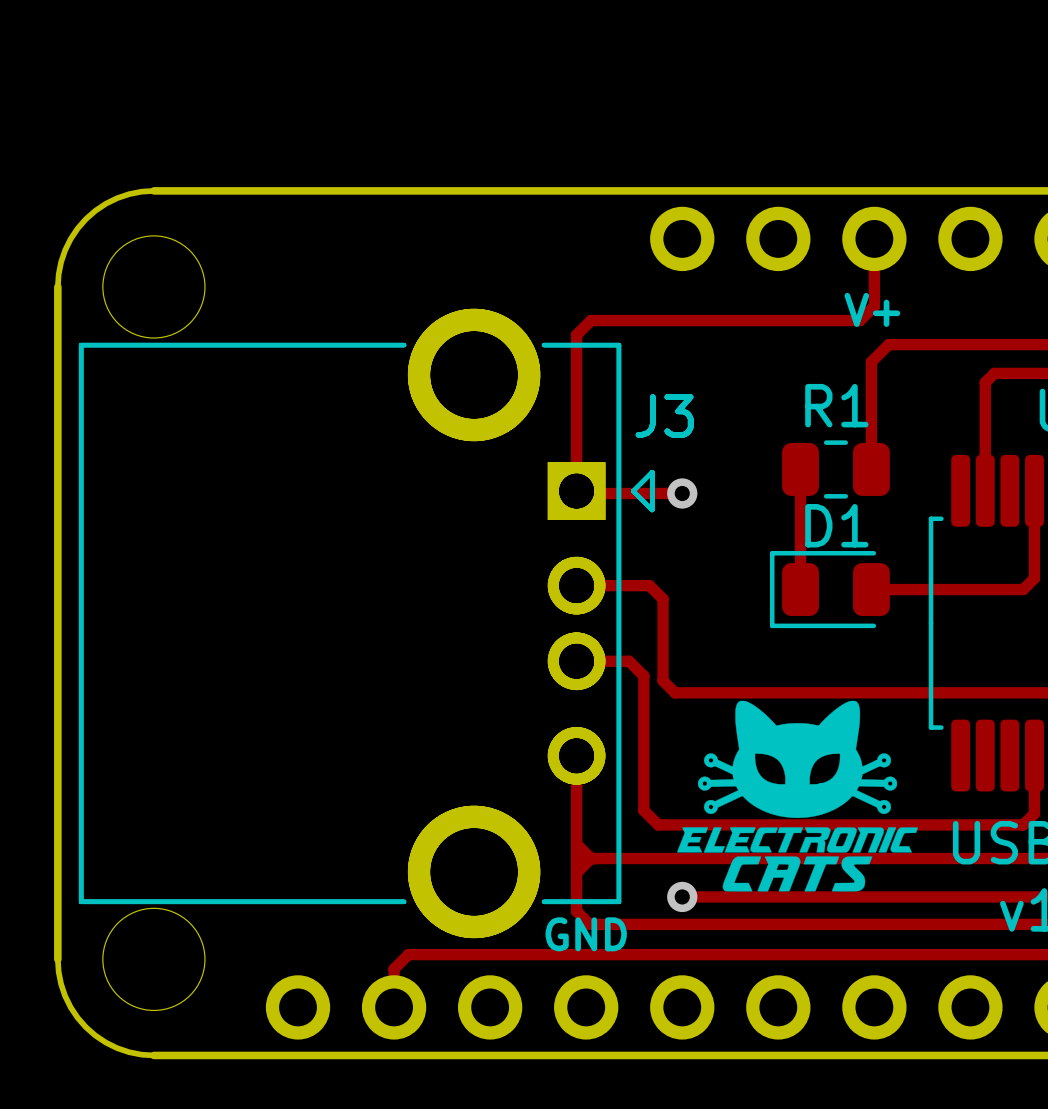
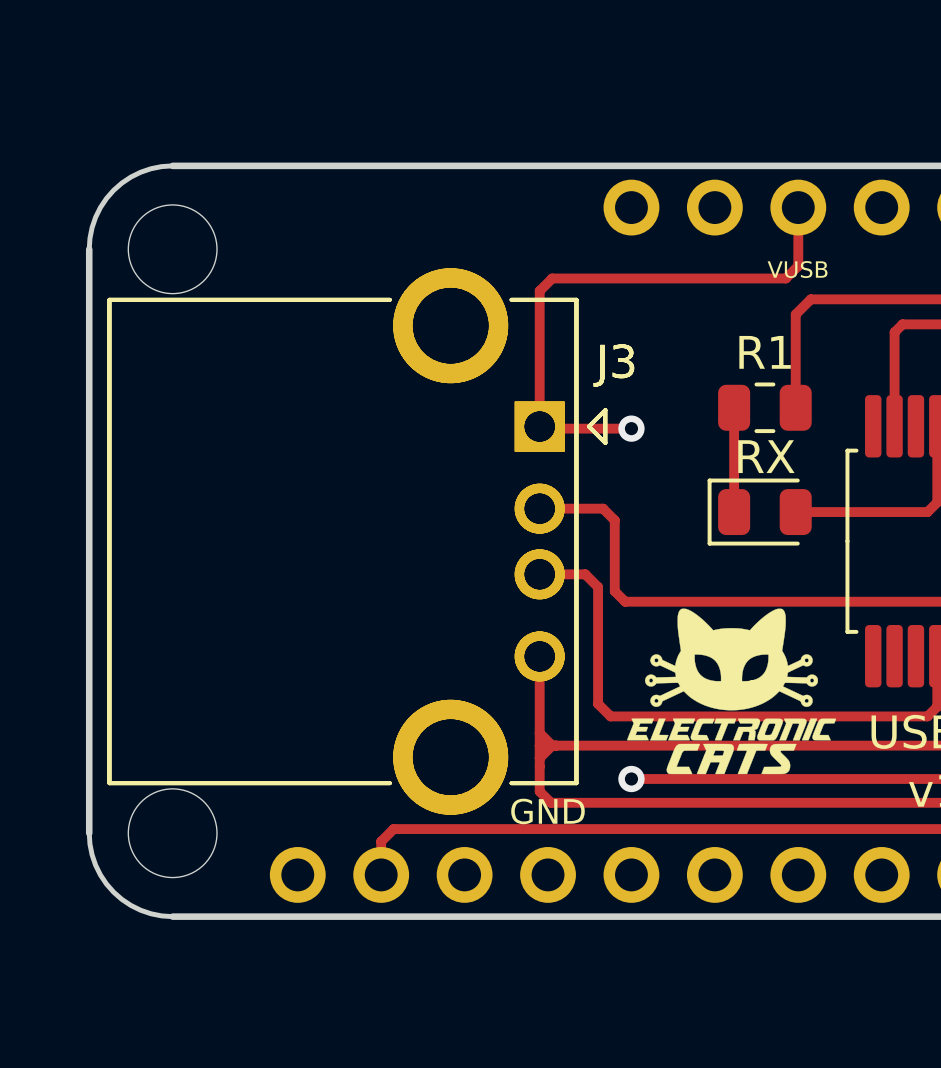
text: V+ (872, 309) -> VUSB (797, 269)
D1 name: D1 (836, 525) -> RX (766, 456)

